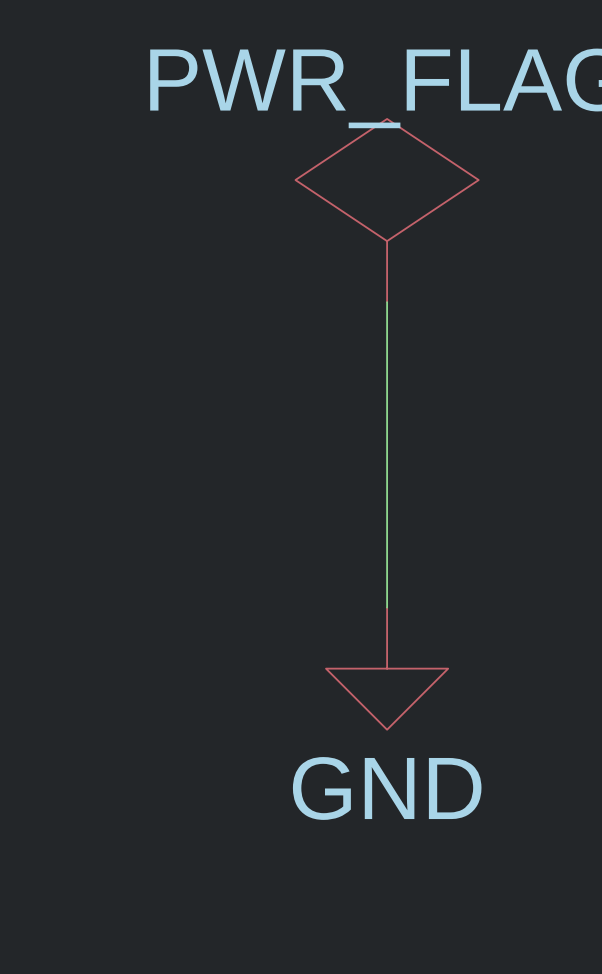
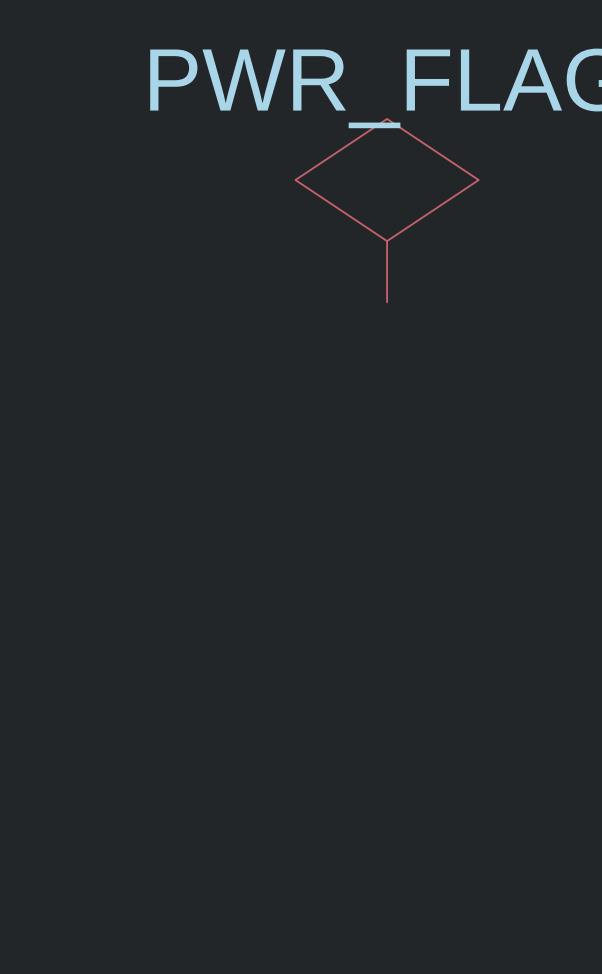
wire: (387, 302) (387, 607) -> none
power symbol: GND (387, 668) -> none

